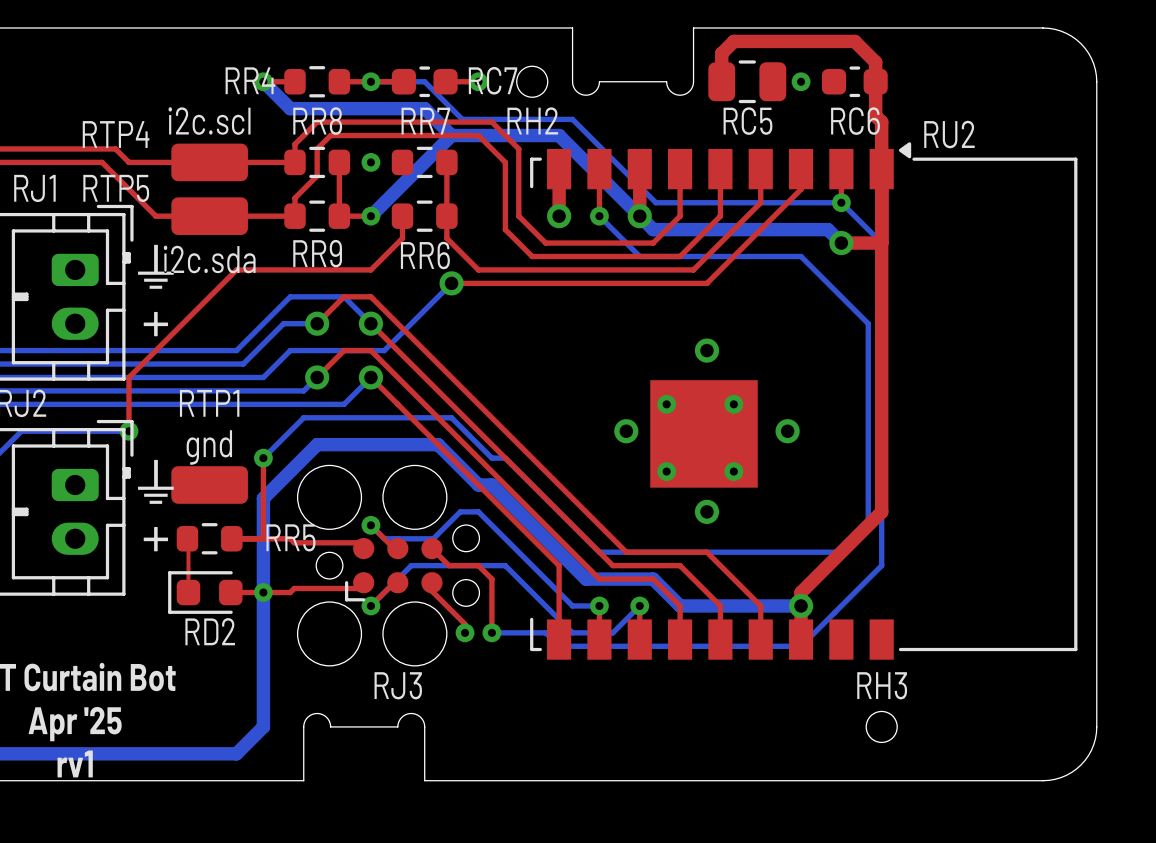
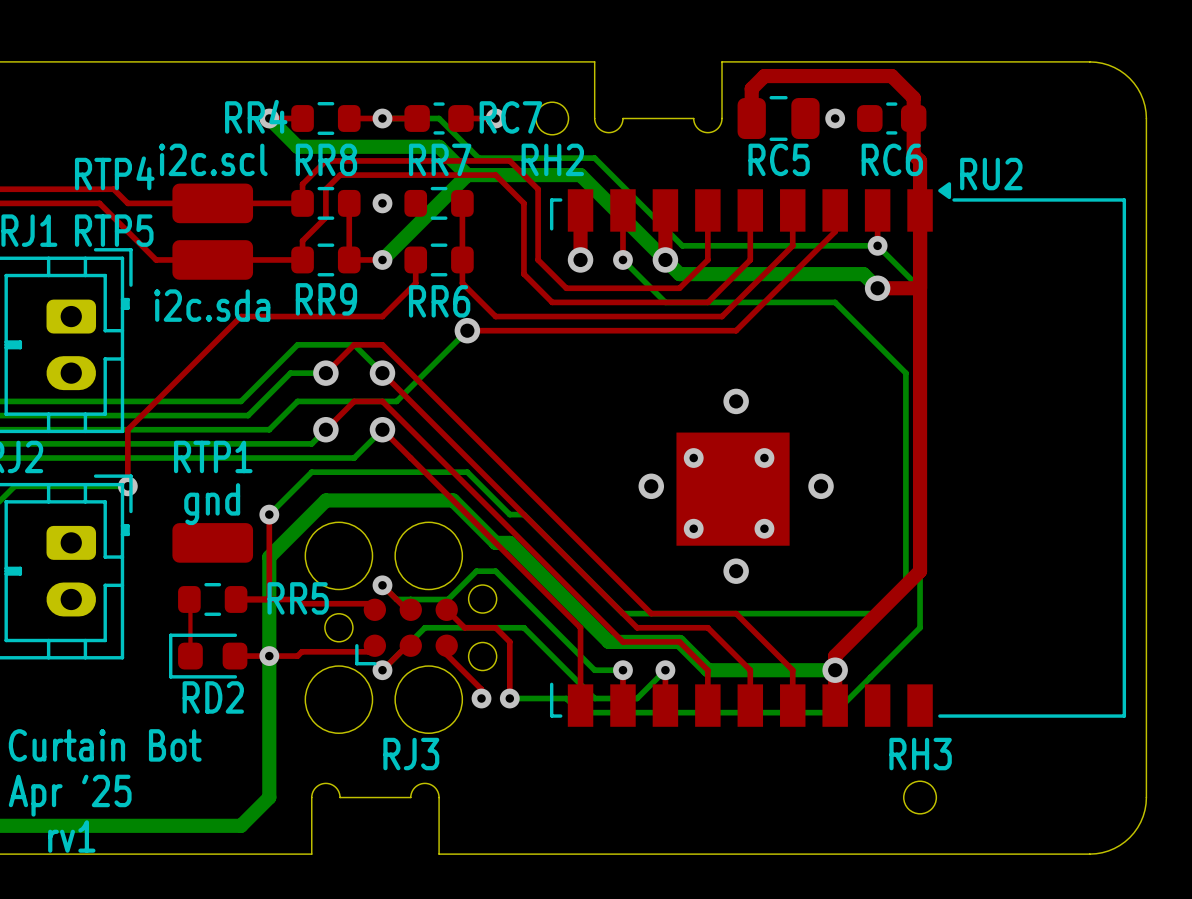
text: ⏚ (155, 266) -> none
text: + (155, 324) -> none
text: ⏚ (155, 481) -> none
text: + (155, 539) -> none

